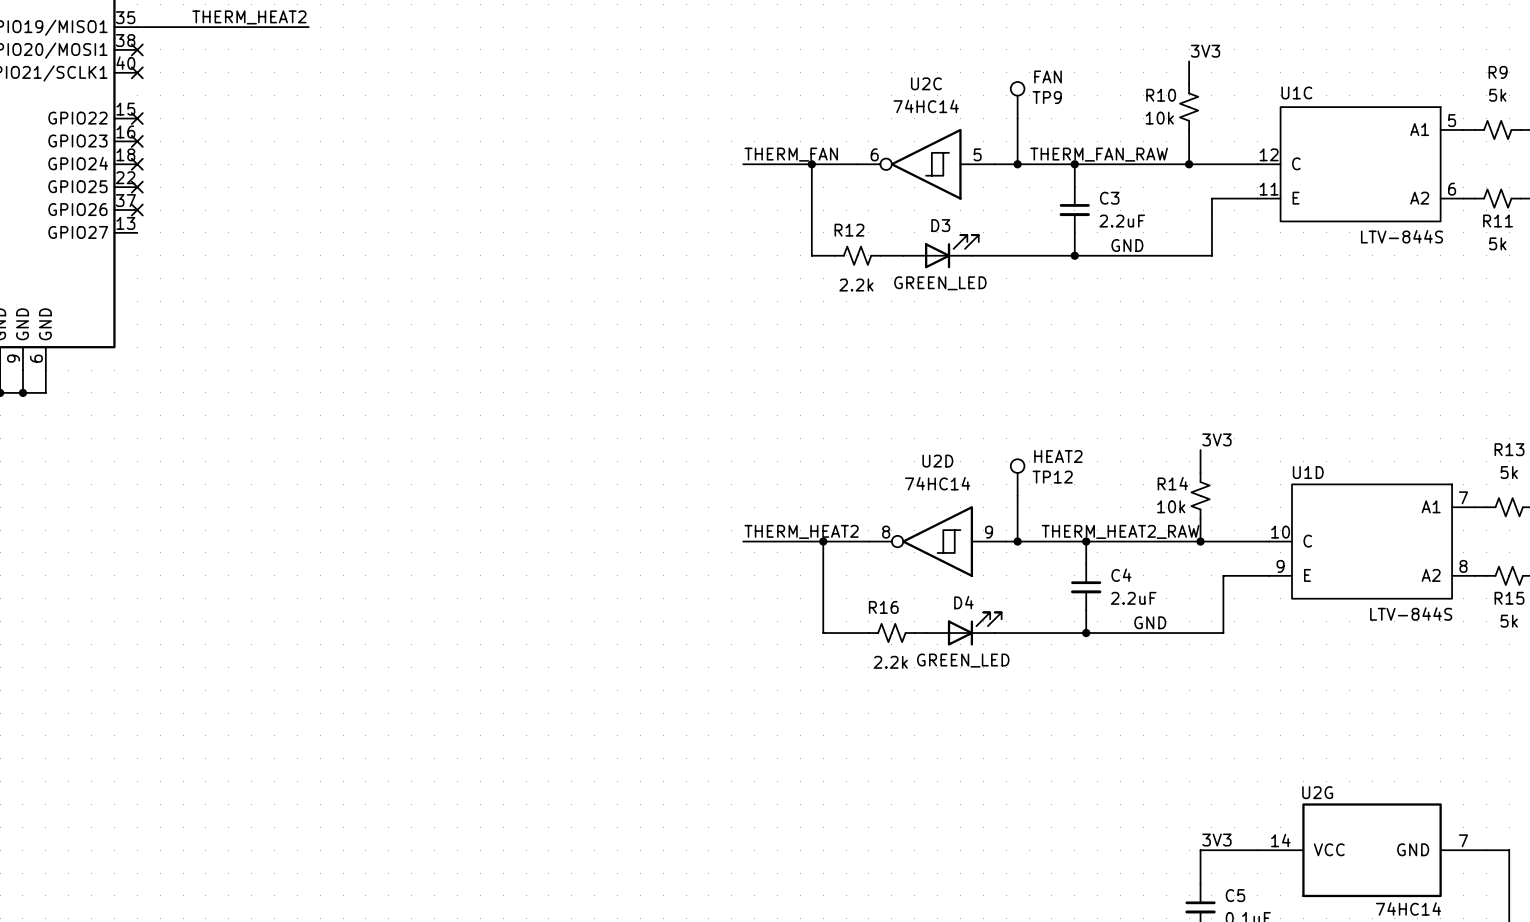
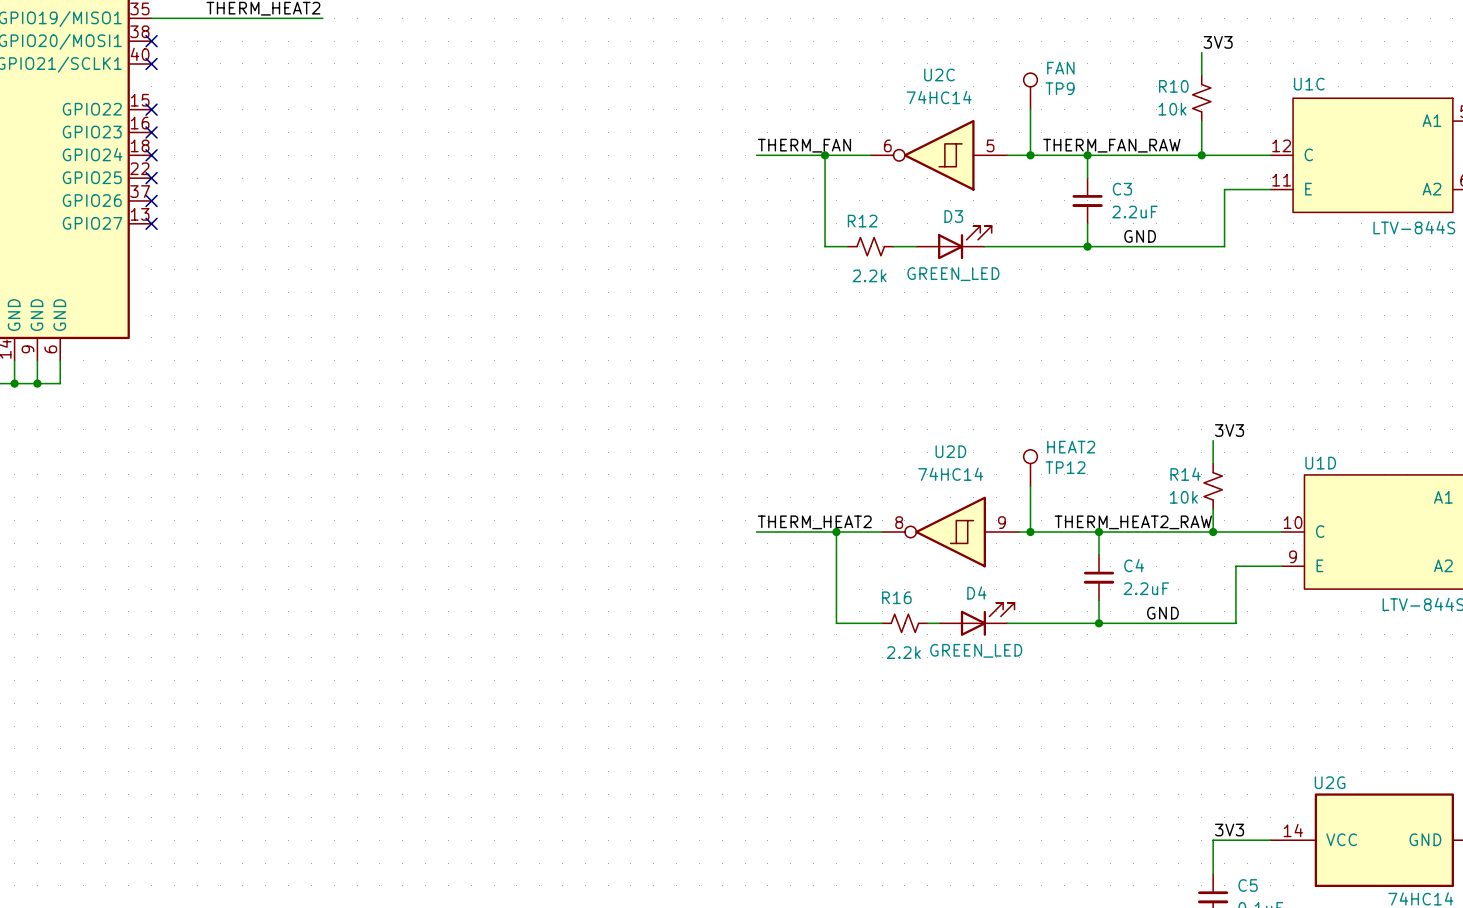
no-connect mark: none -> (151, 223)

